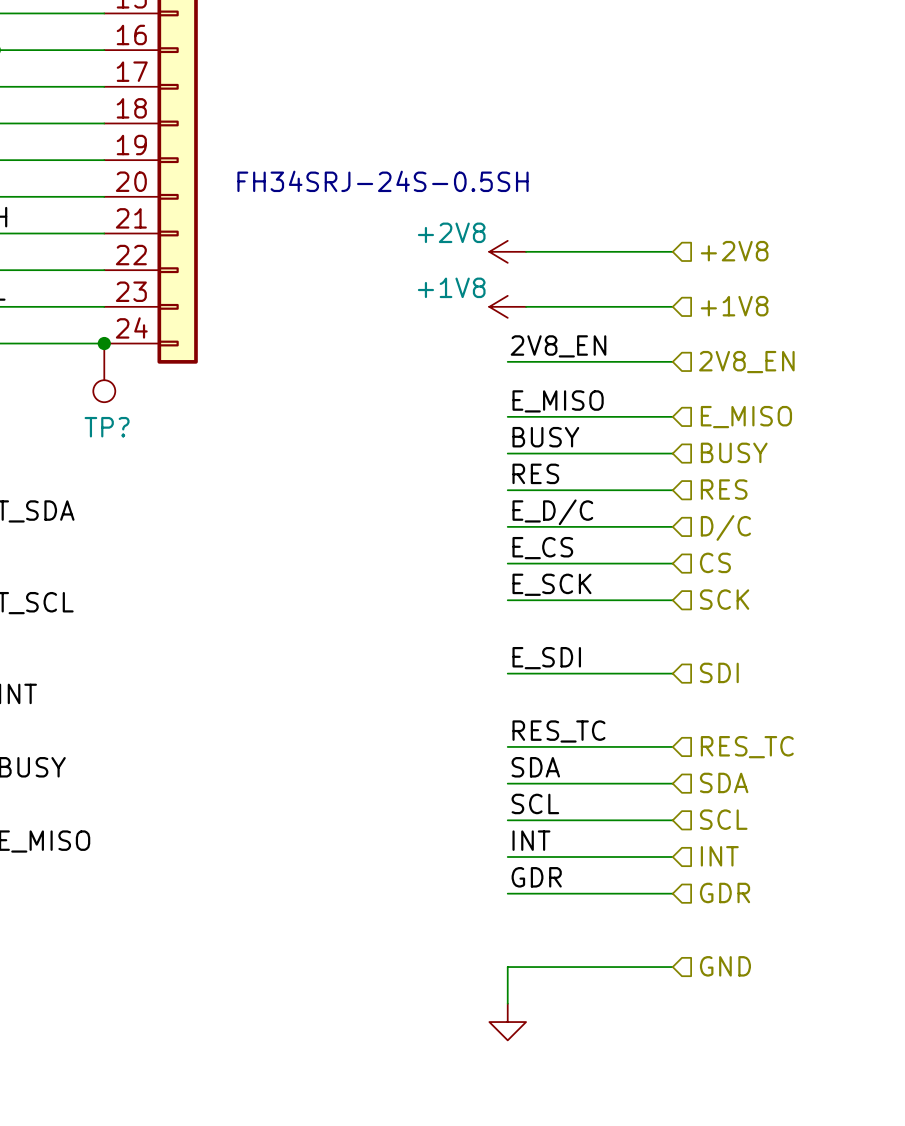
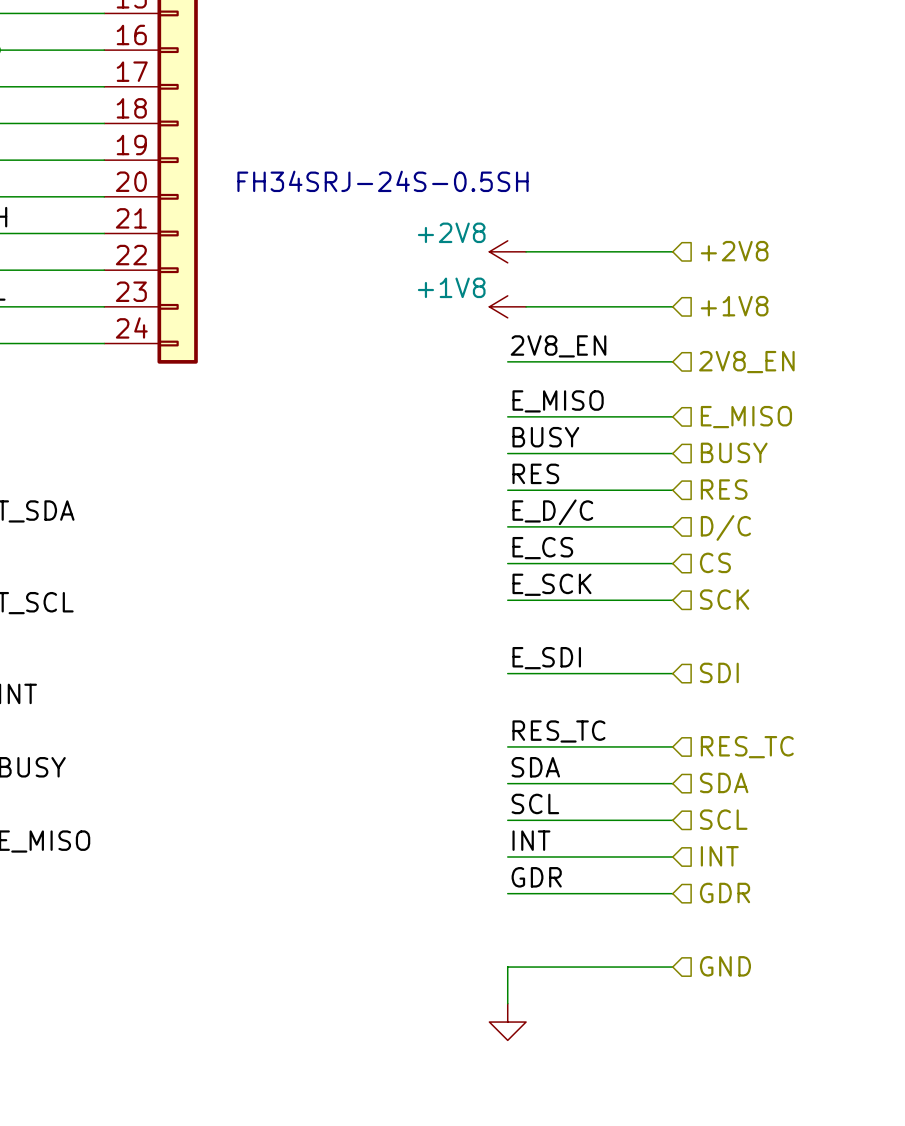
junction: (104, 343) -> none
TP?: (104, 372) -> none

